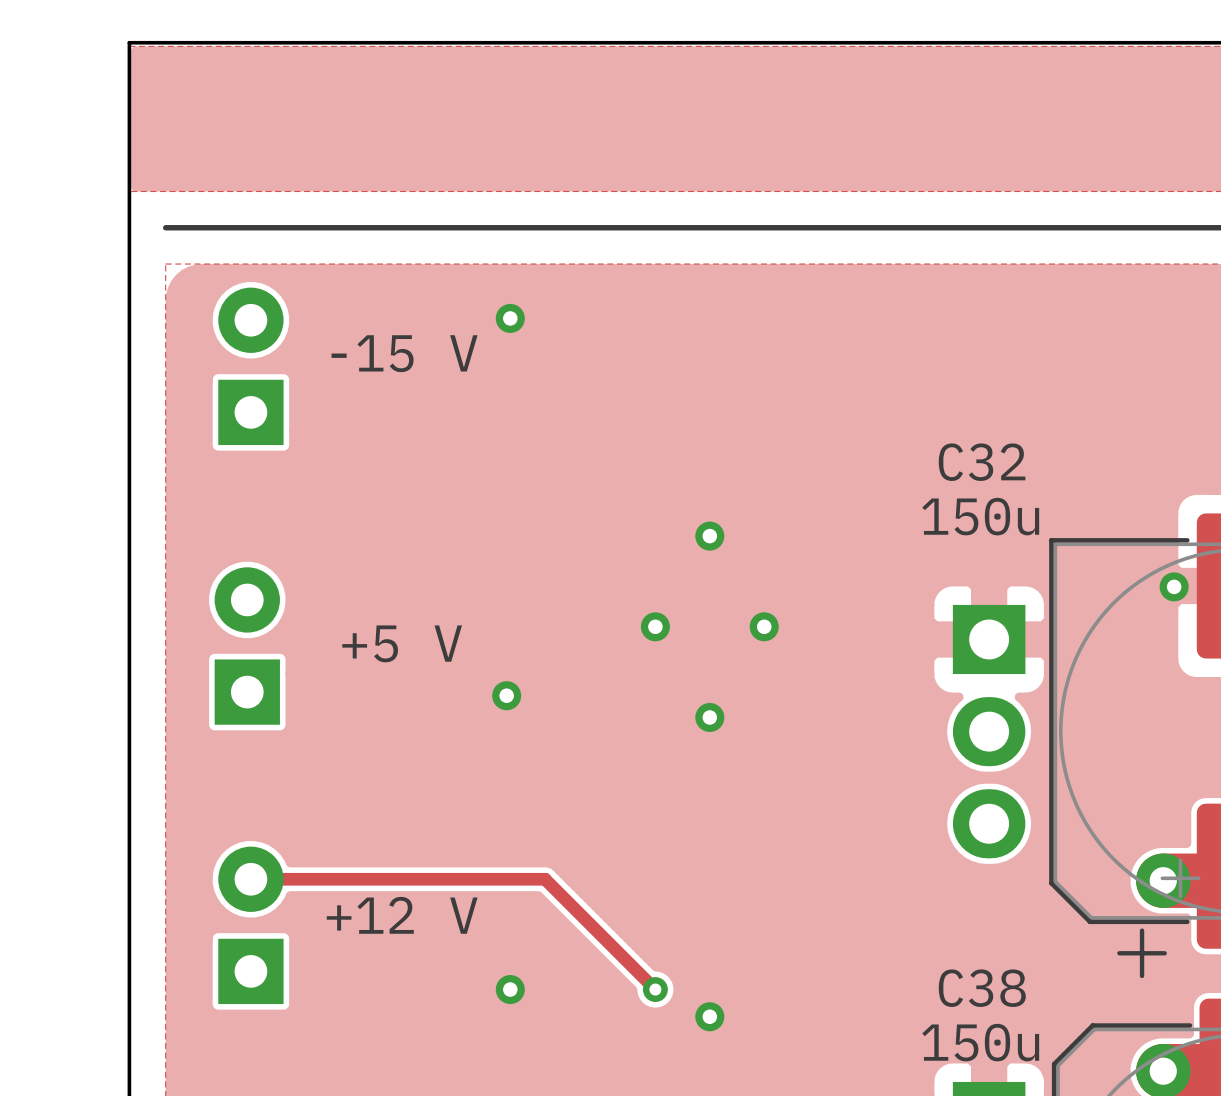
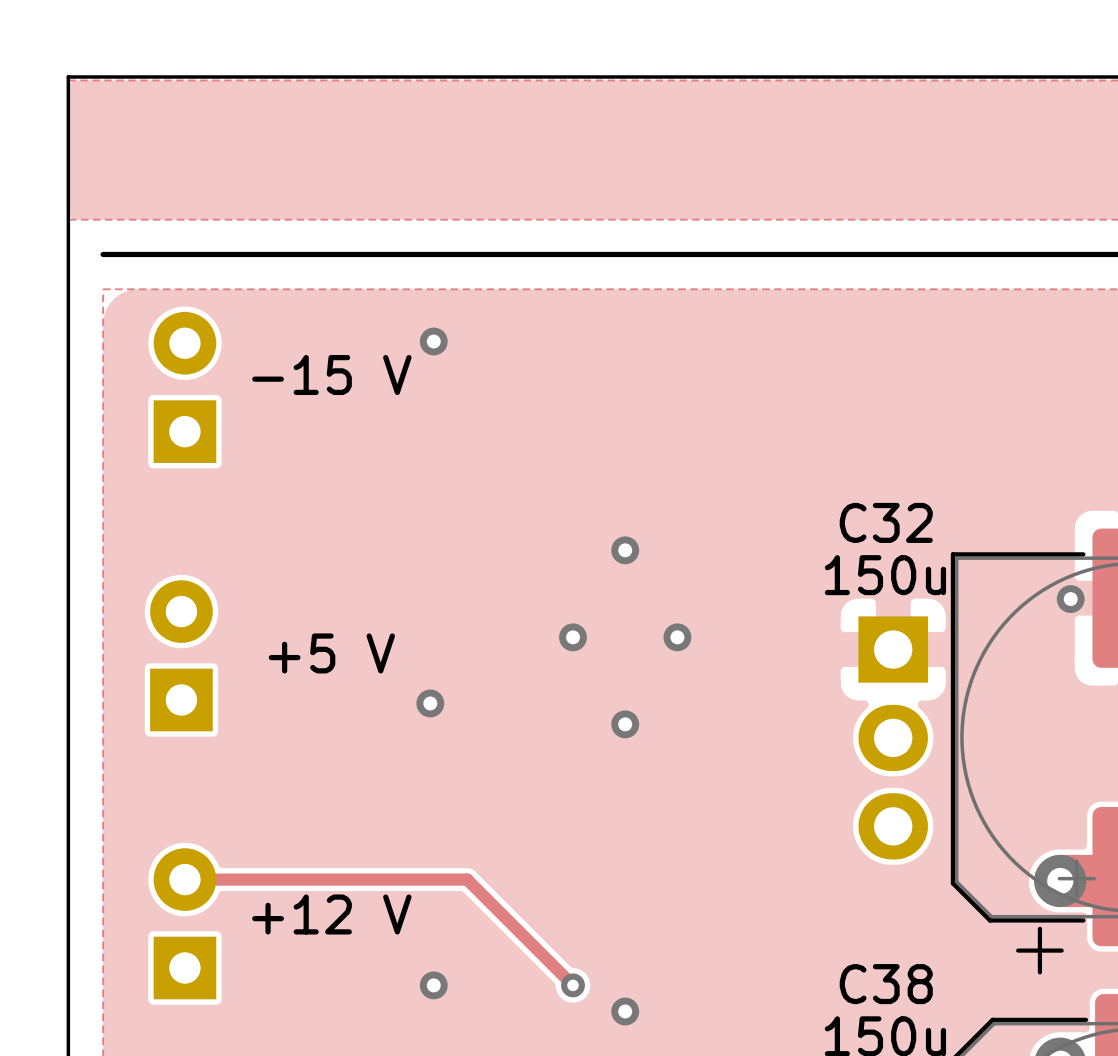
C32 name position: C32 (982, 462) -> C32 (886, 522)
C32 value position: 150u (980, 516) -> 150u (885, 575)

